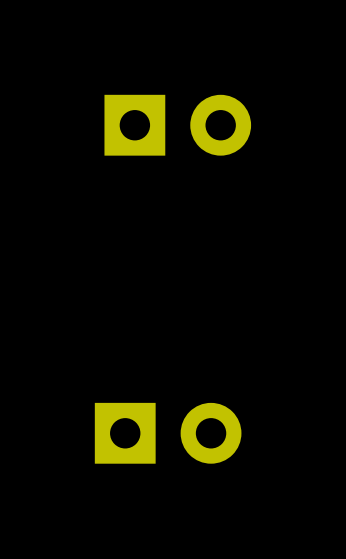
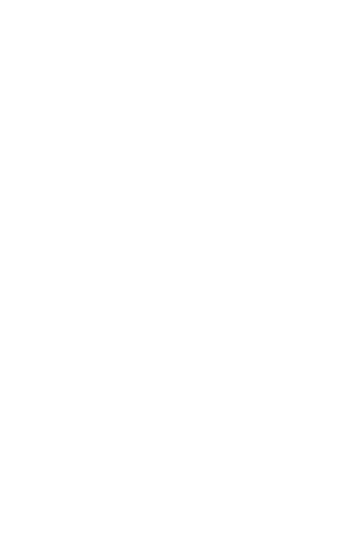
part: (177, 125) -> none
part: (168, 433) -> none

